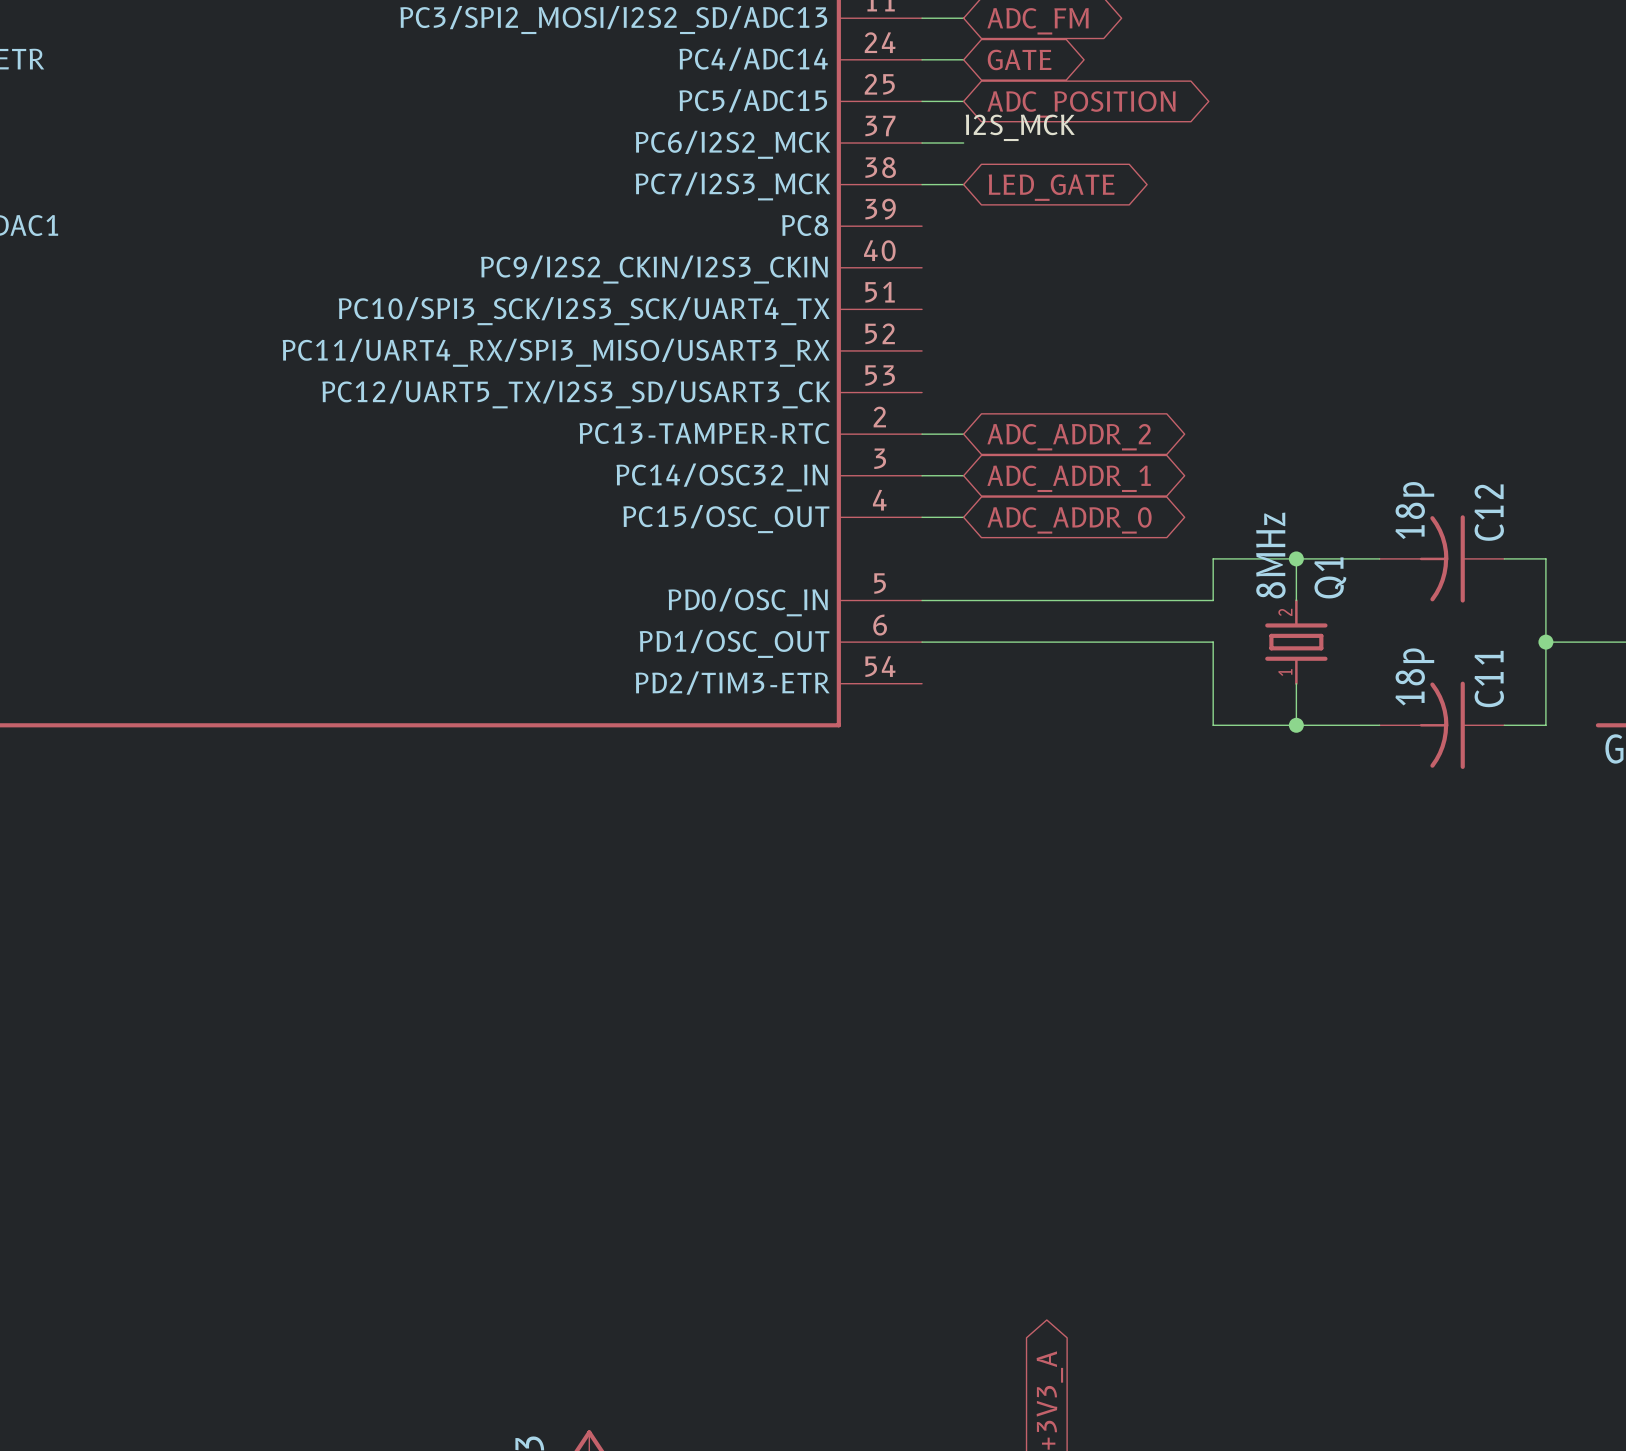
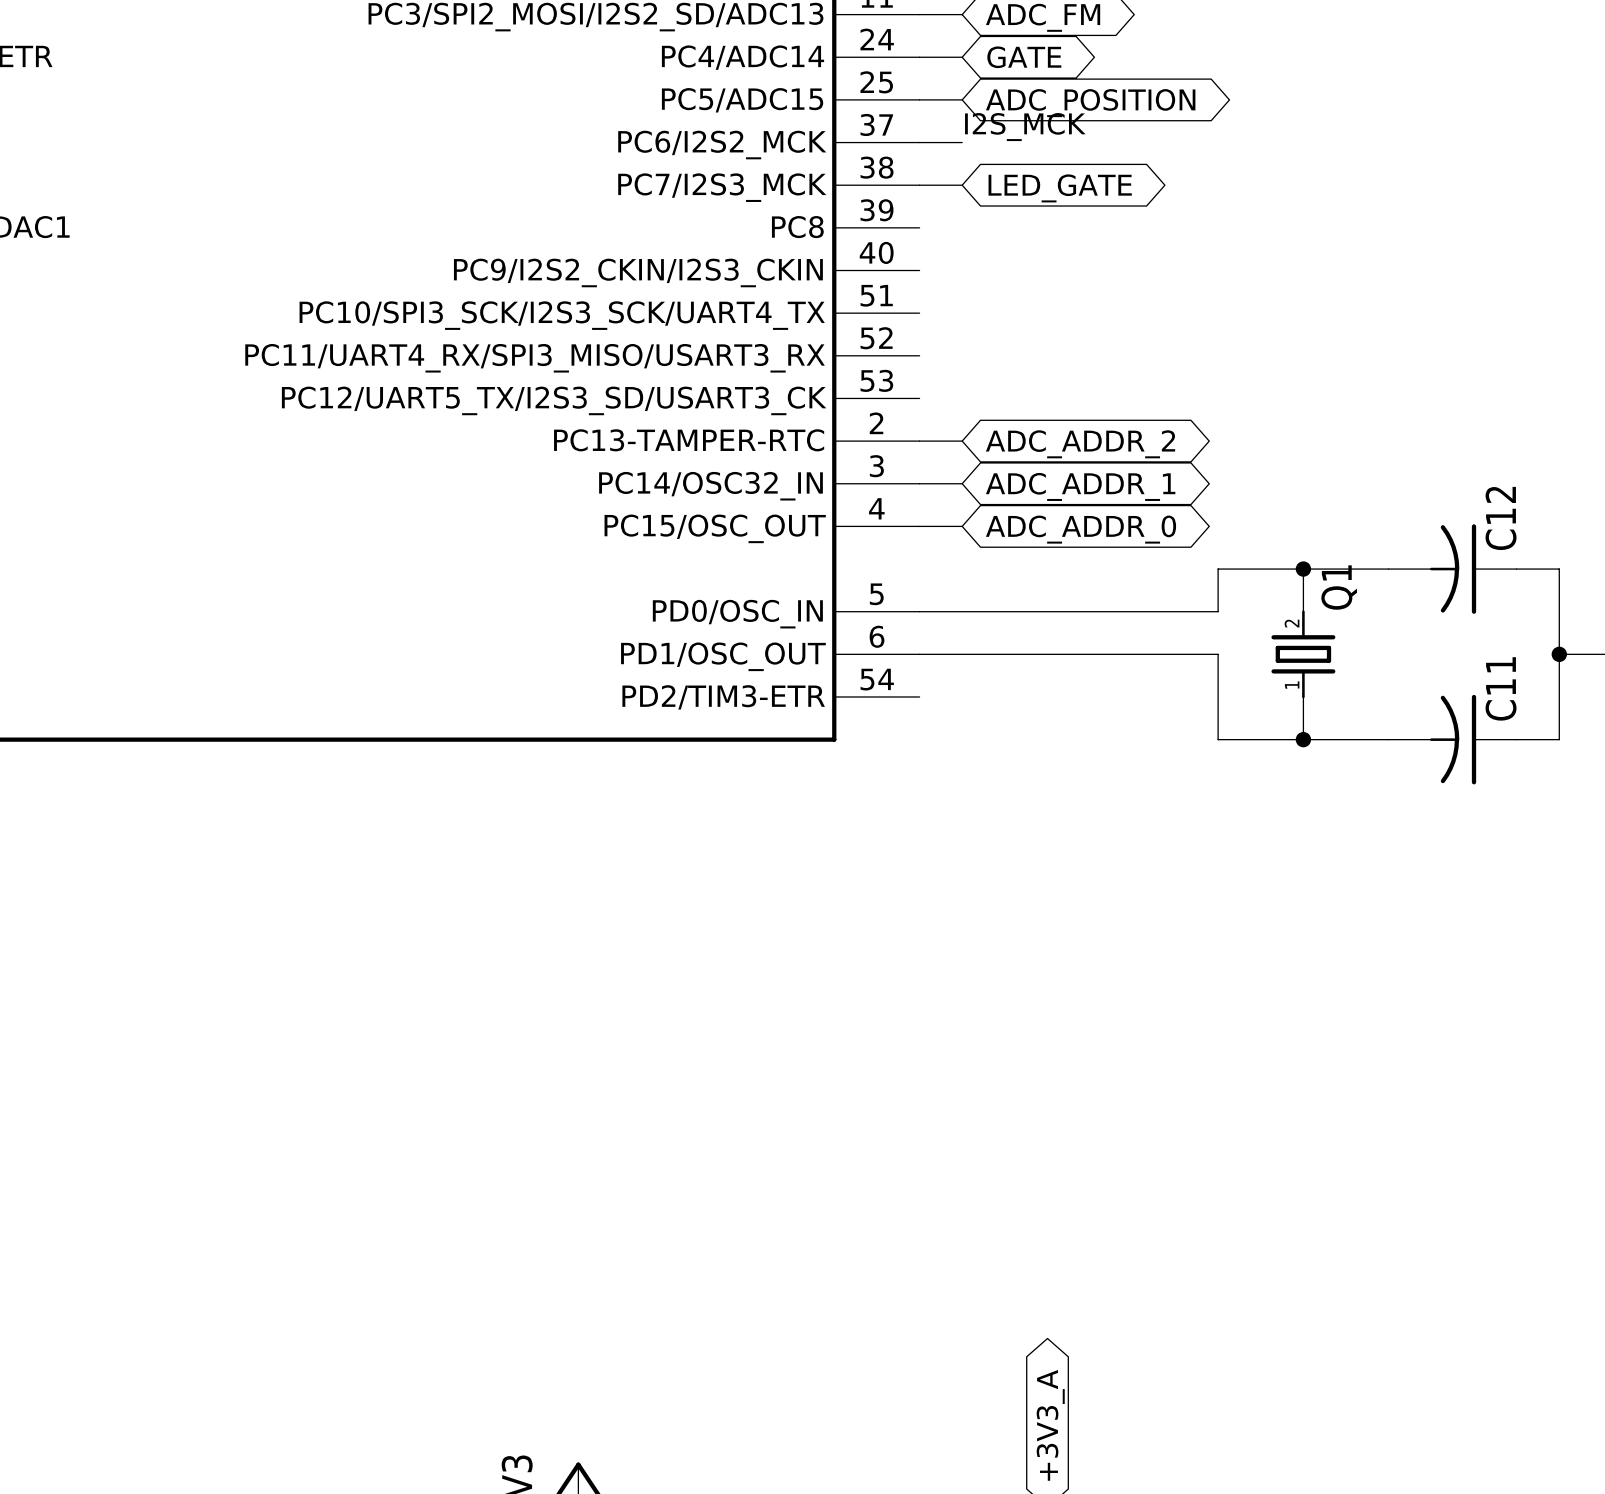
C12 value: 18p (1414, 510) -> none
Q1 value: 8MHz (1270, 555) -> none
C11 value: 18p (1414, 676) -> none

